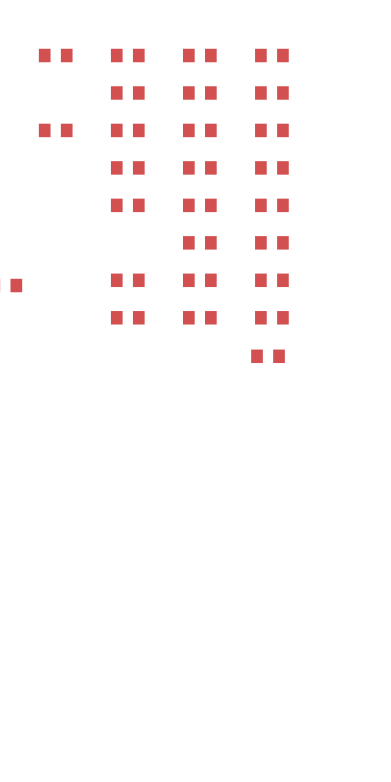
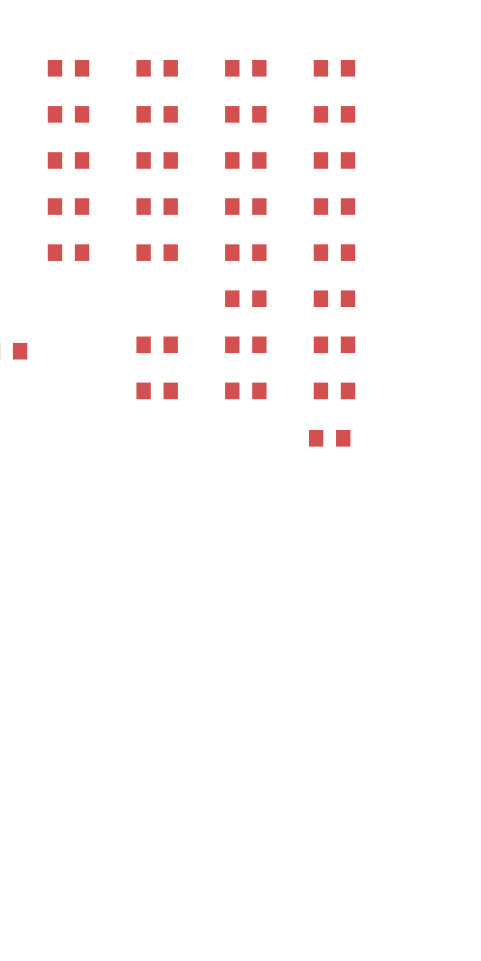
part: none -> (68, 114)
part: none -> (68, 206)
part: none -> (68, 252)

